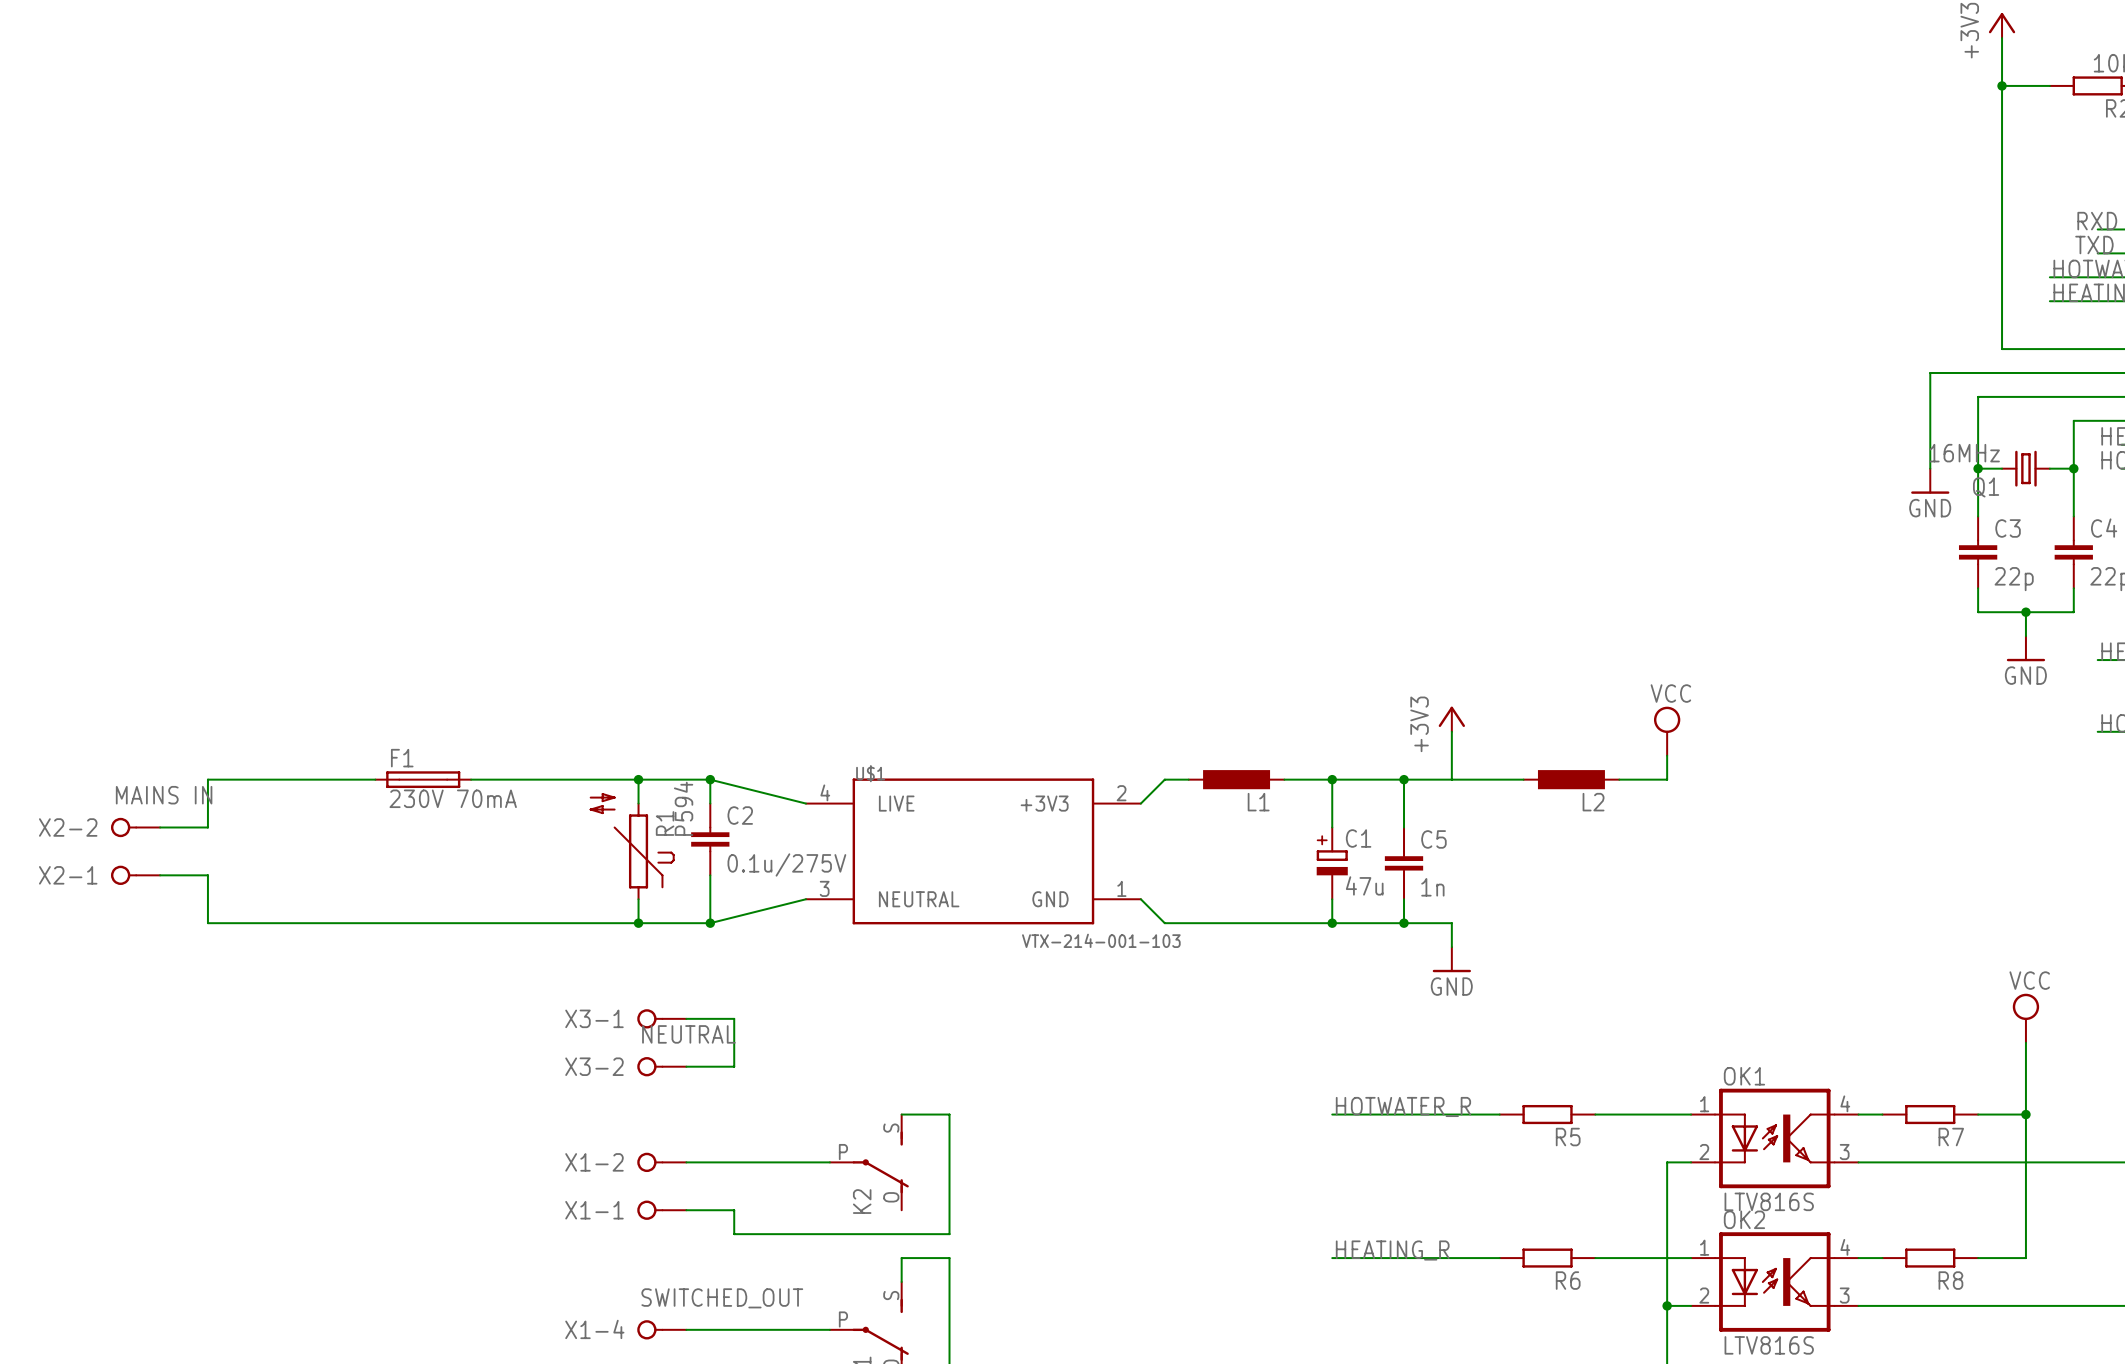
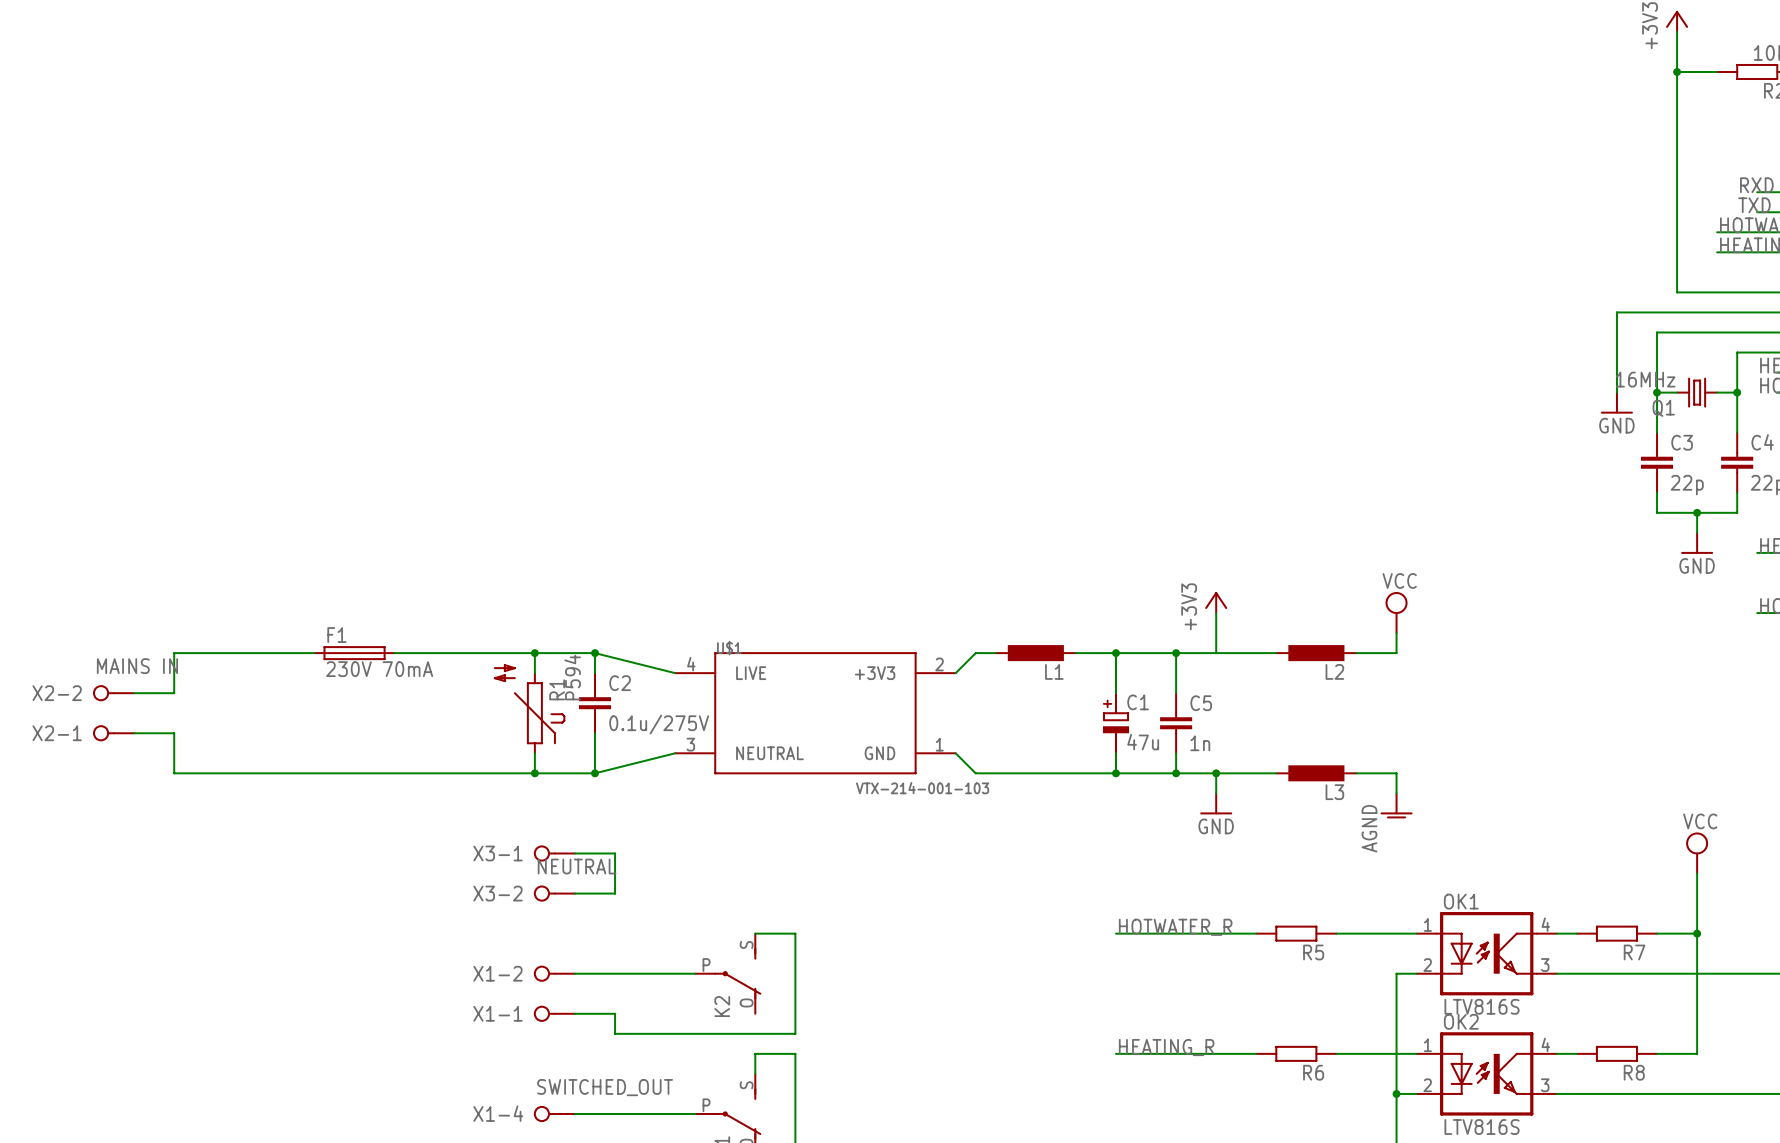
wire: none -> (1216, 773) (1276, 773)
junction: none -> (1216, 773)
L3: none -> (1316, 773)
wire: none -> (1356, 773) (1396, 773) (1396, 793)
power symbol: none -> AGND (1396, 805)

